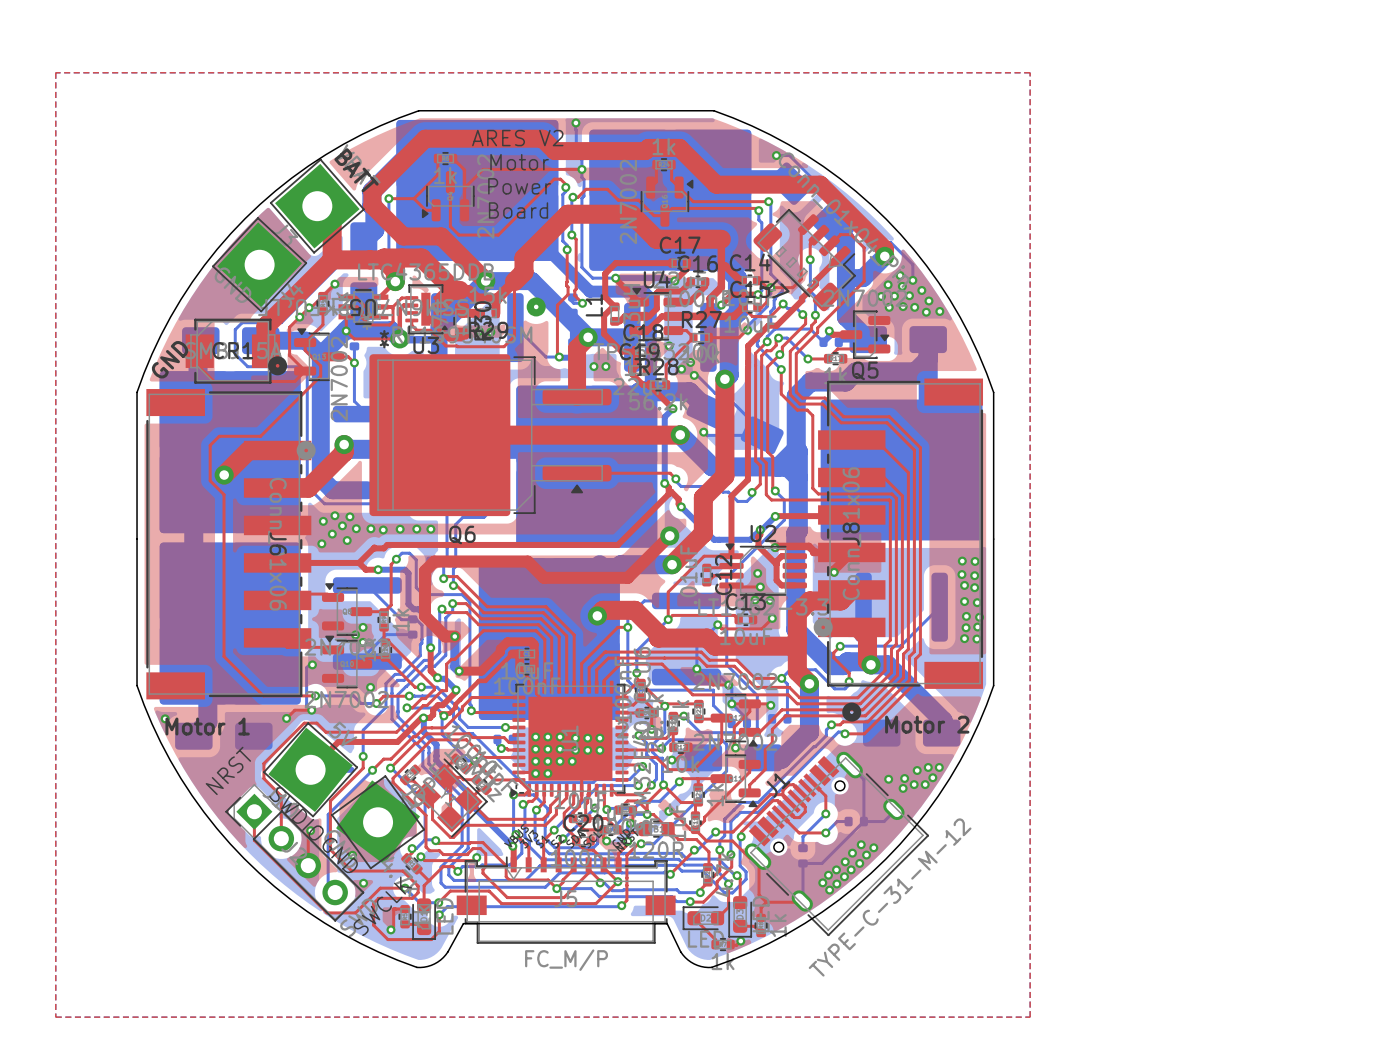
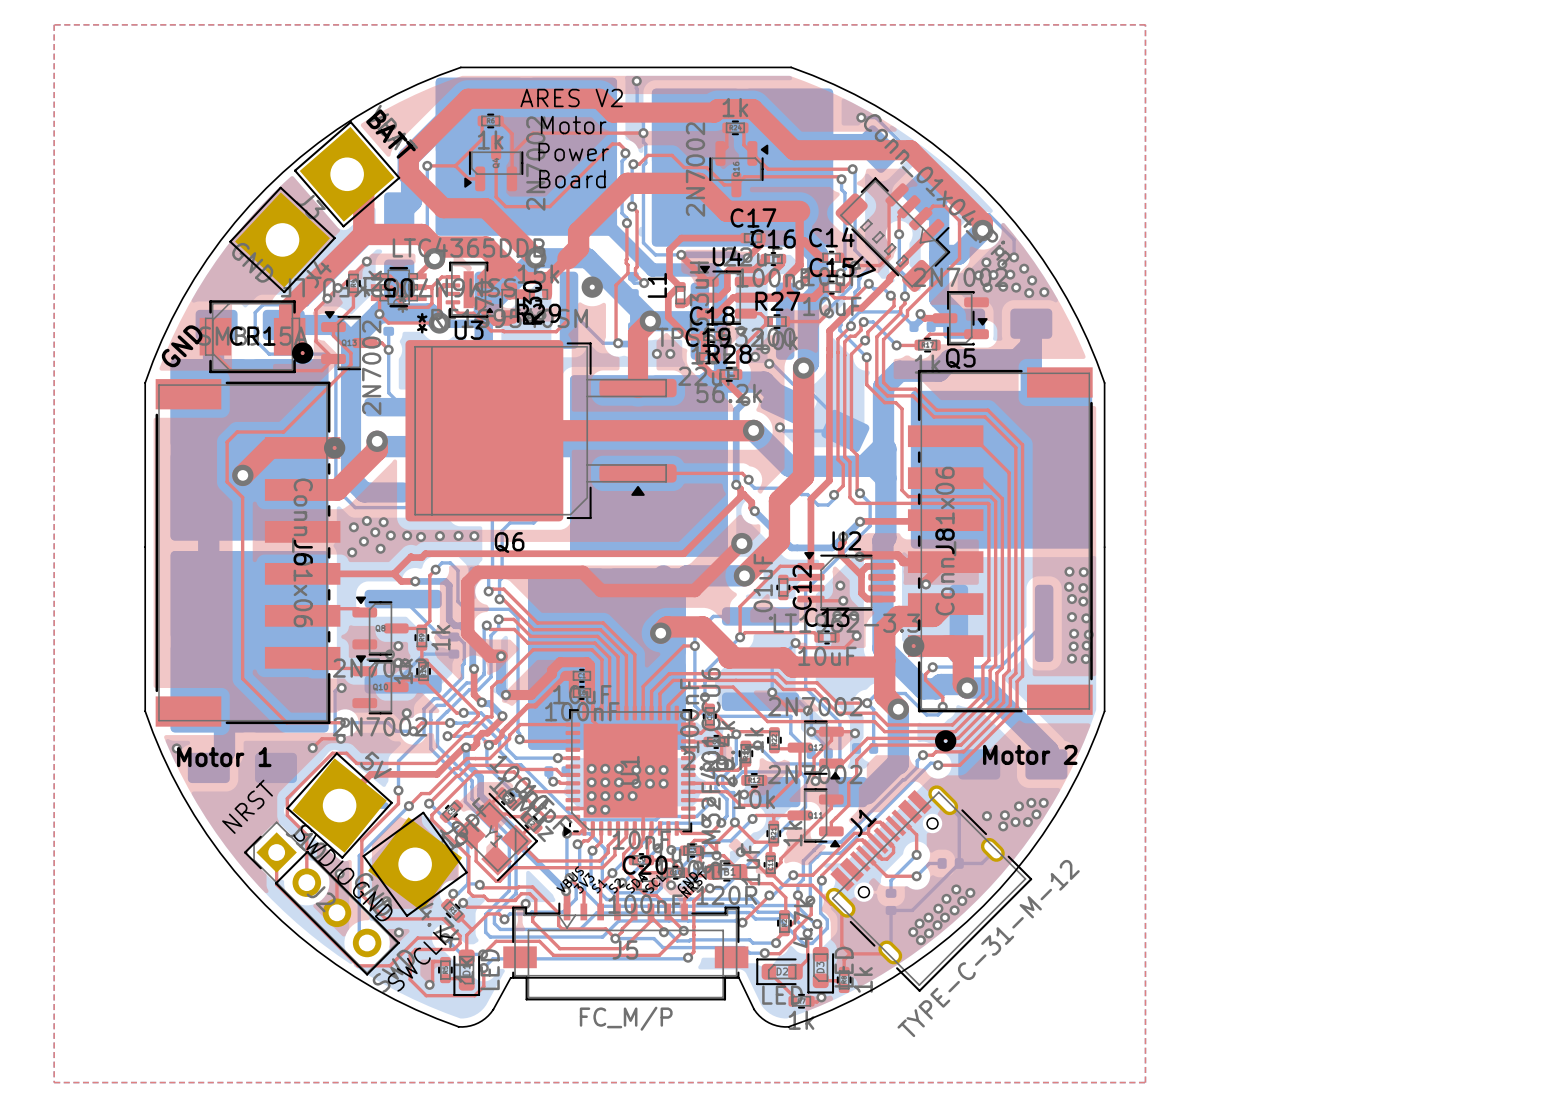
top track: (384, 259) (384, 258) (421, 258) (453, 290) (459, 290) -> none
top track: none -> (434, 247) (486, 247) (507, 268)

